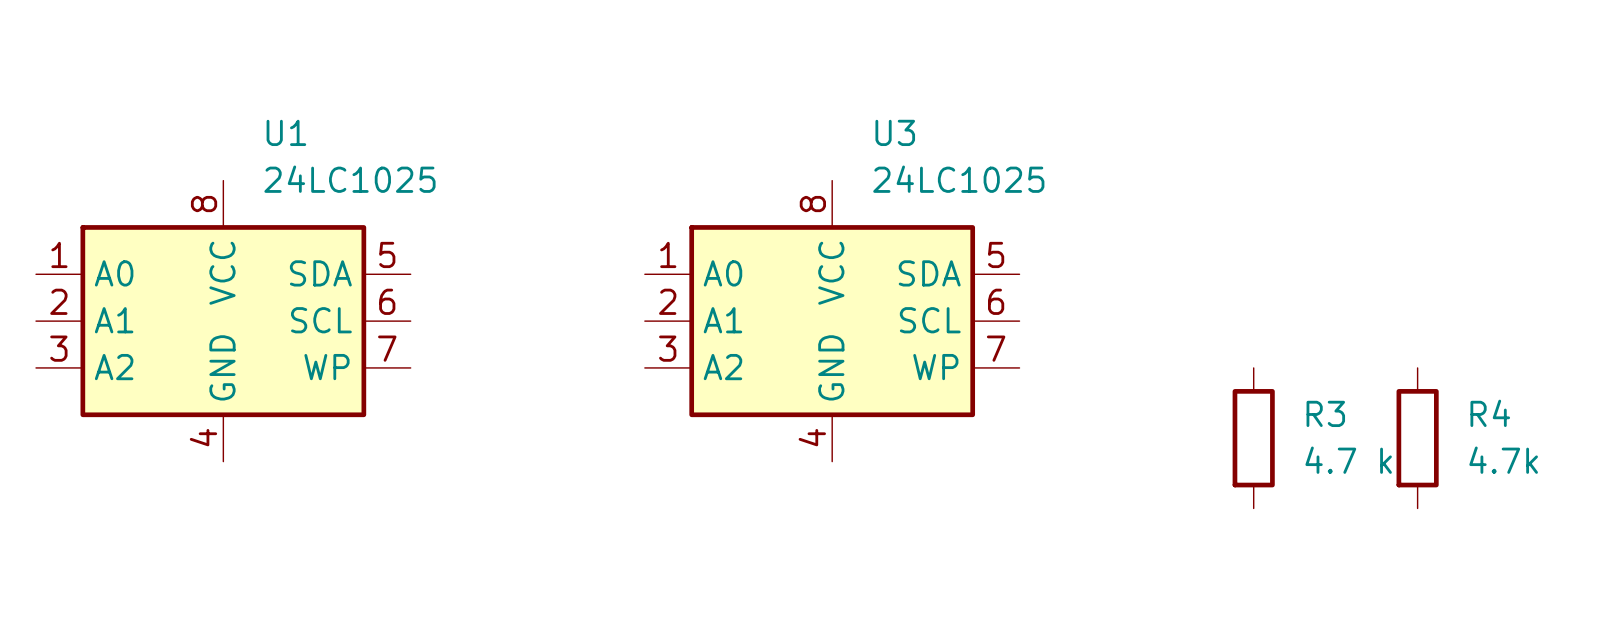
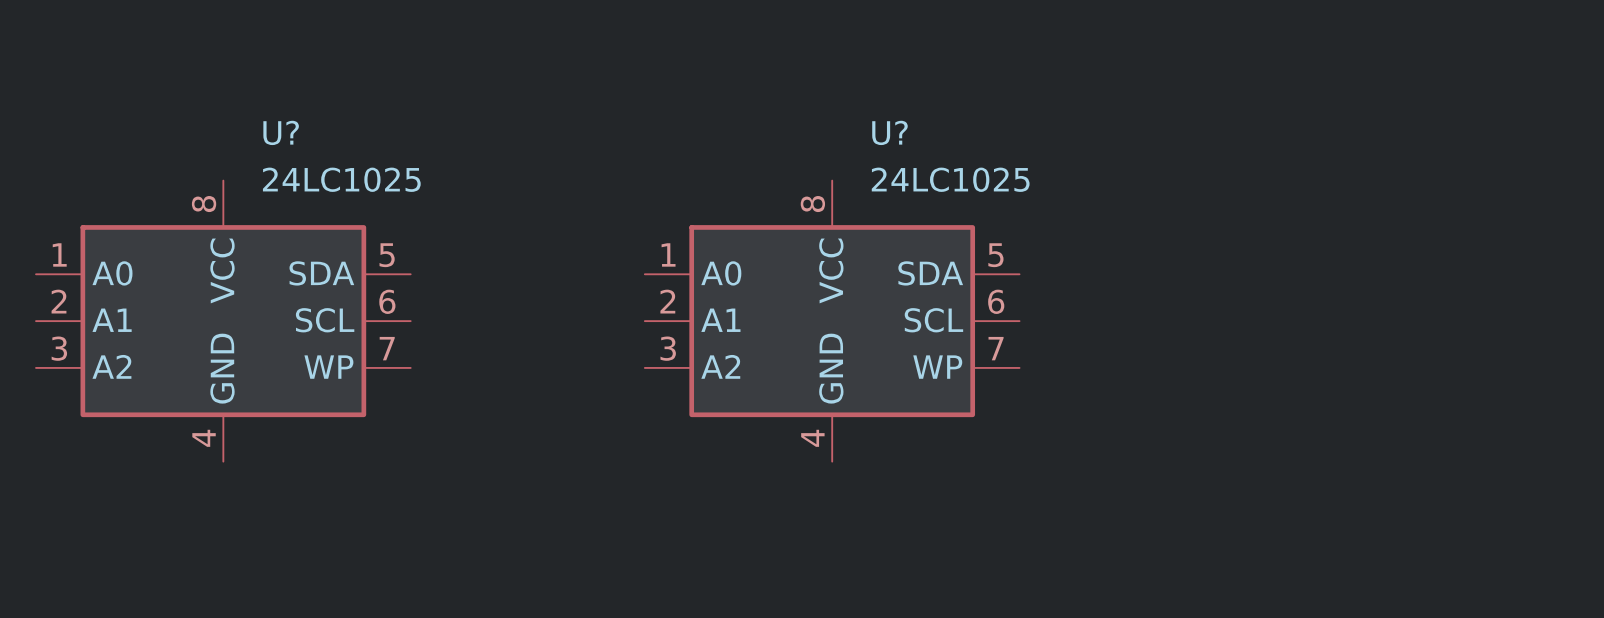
U1 name: U1 (286, 132) -> U? (281, 132)
U3 name: U3 (895, 132) -> U? (889, 132)
R3: 4.7 k (1253, 438) -> none
R4: 4.7k (1417, 438) -> none

